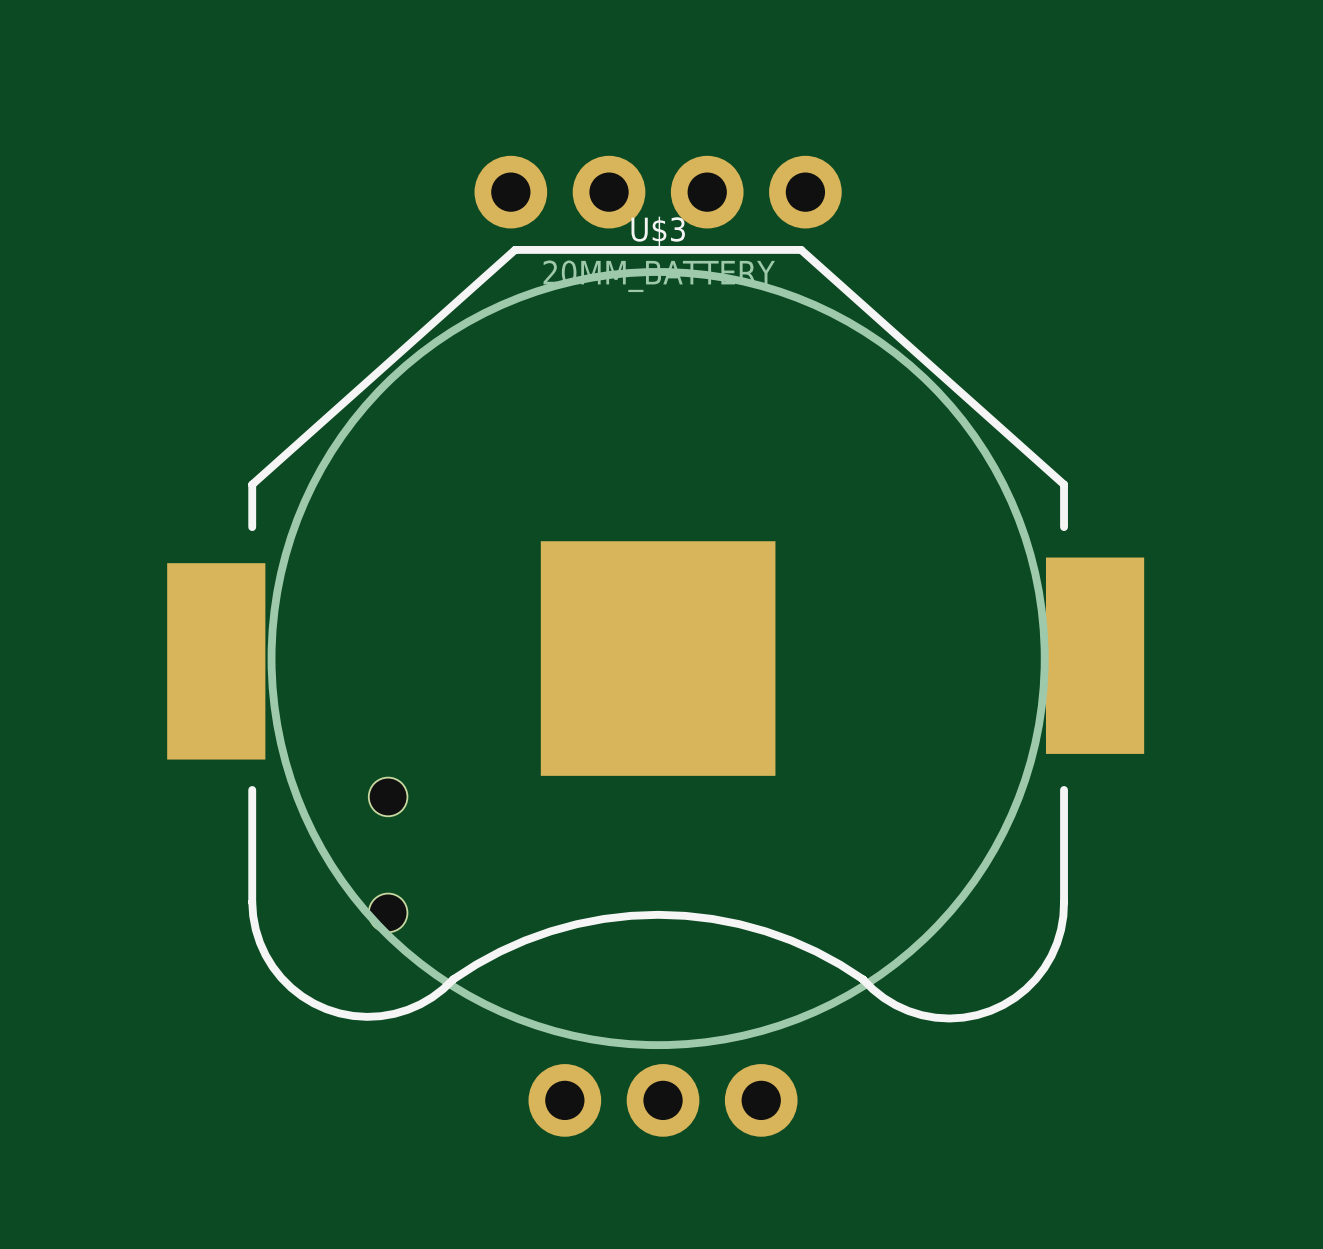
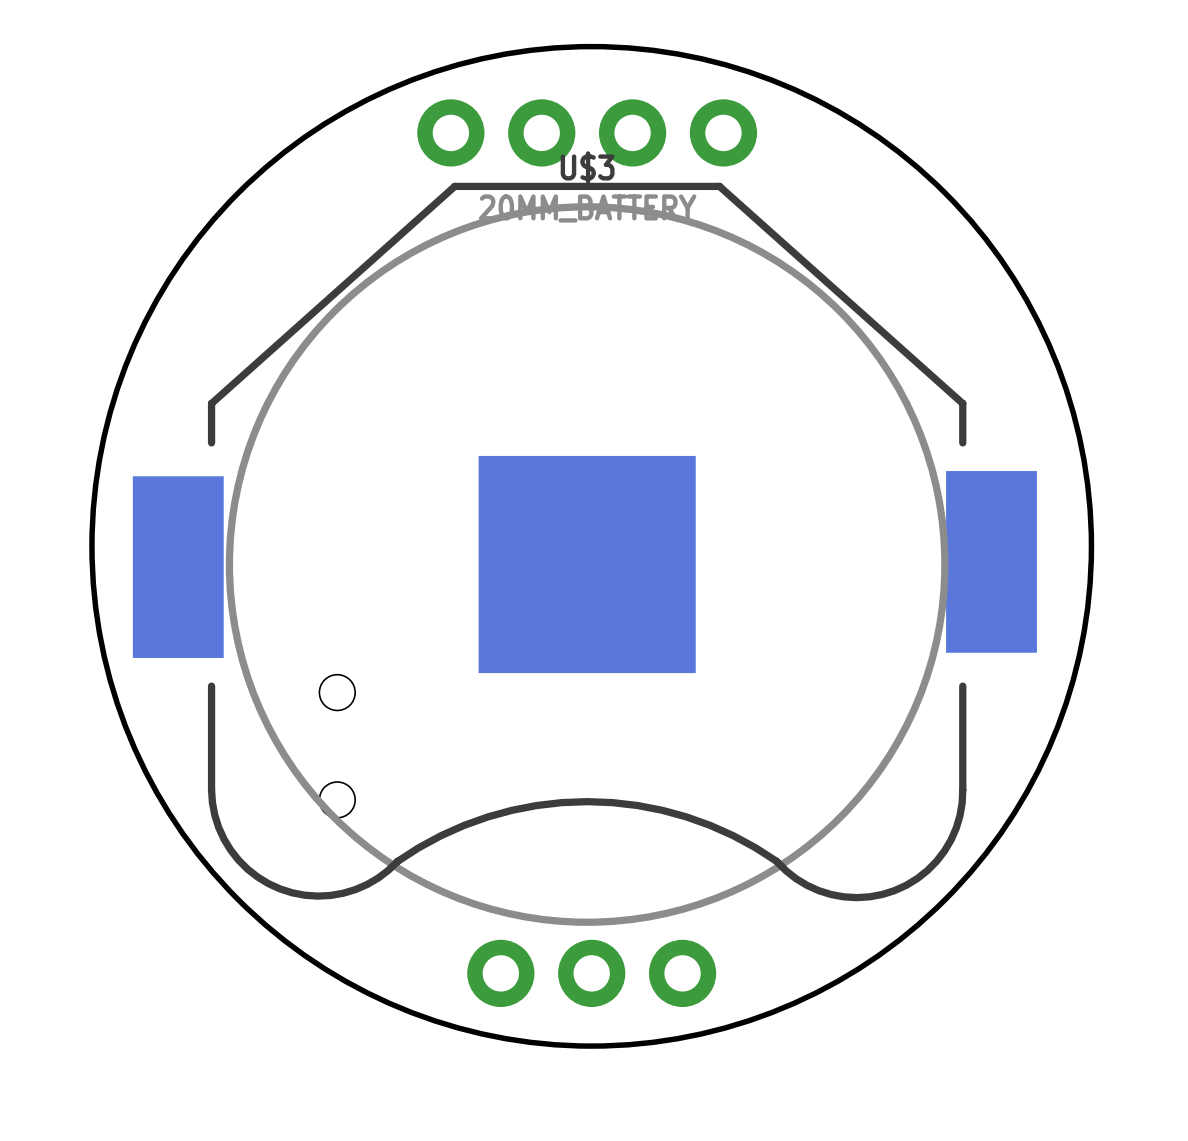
round board edge: none -> [89, 43, 1095, 1049]

